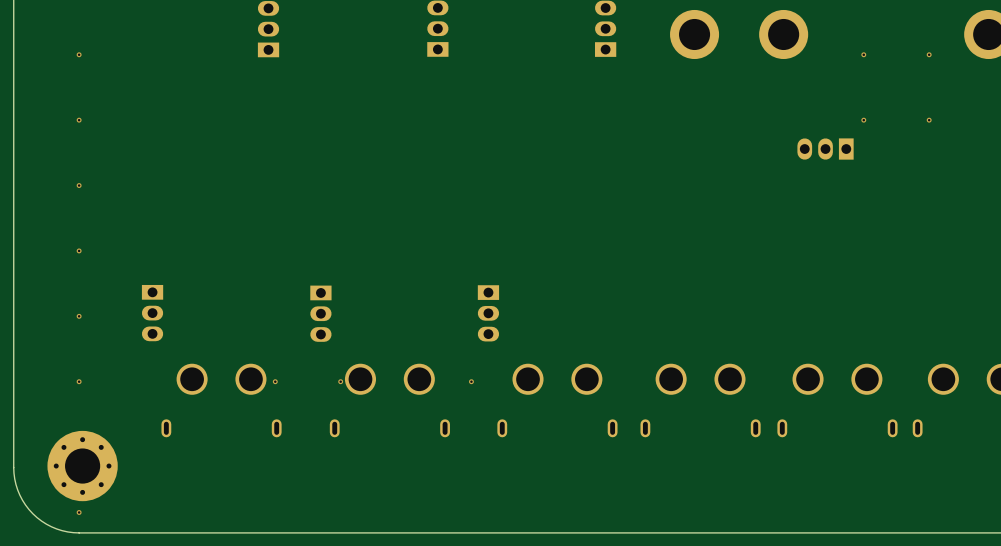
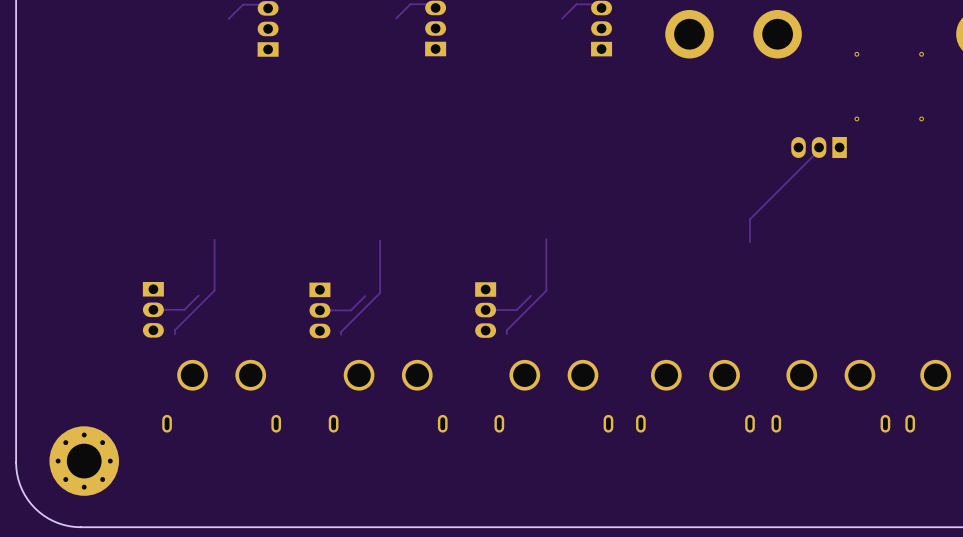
track: none -> (274, 4) (242, 4) (228, 18)
track: none -> (441, 4) (410, 4) (396, 18)
track: none -> (607, 4) (576, 4) (562, 18)
via: (79, 54) -> none
via: (79, 120) -> none
track: none -> (818, 151) (749, 219) (749, 241)
via: (79, 185) -> none
track: none -> (546, 239) (546, 290) (506, 330) (506, 334)
track: none -> (214, 239) (214, 290) (174, 330) (174, 334)
track: none -> (380, 240) (380, 293) (341, 331) (341, 334)
via: (79, 250) -> none
track: none -> (198, 295) (184, 309) (153, 309)
track: none -> (530, 295) (516, 310) (485, 310)
track: none -> (365, 296) (350, 310) (319, 310)
via: (79, 316) -> none
via: (79, 381) -> none
via: (275, 381) -> none
via: (340, 381) -> none
via: (471, 381) -> none
via: (79, 512) -> none

